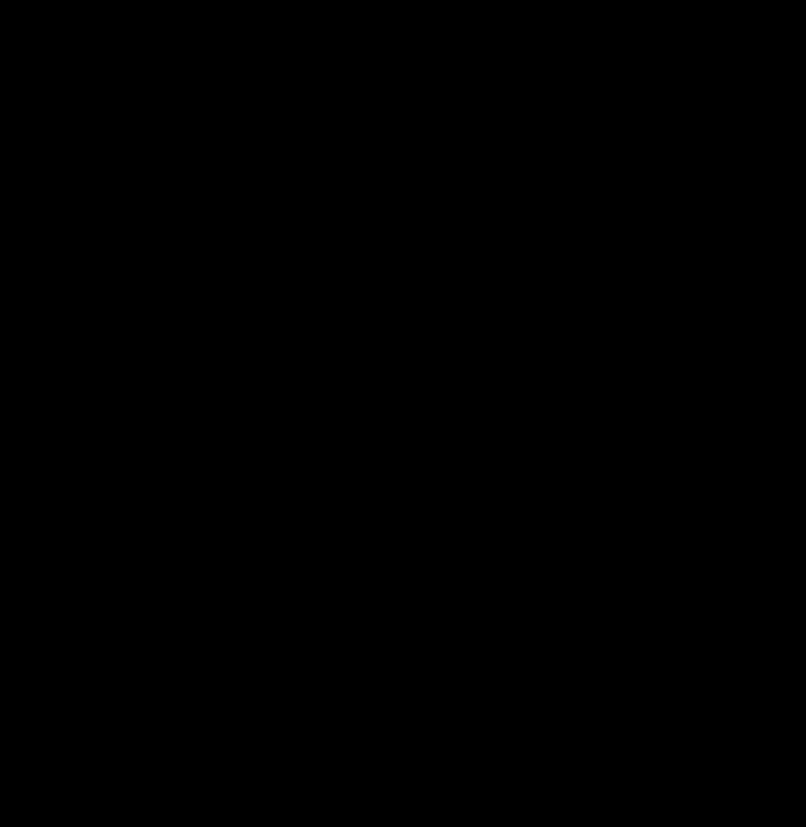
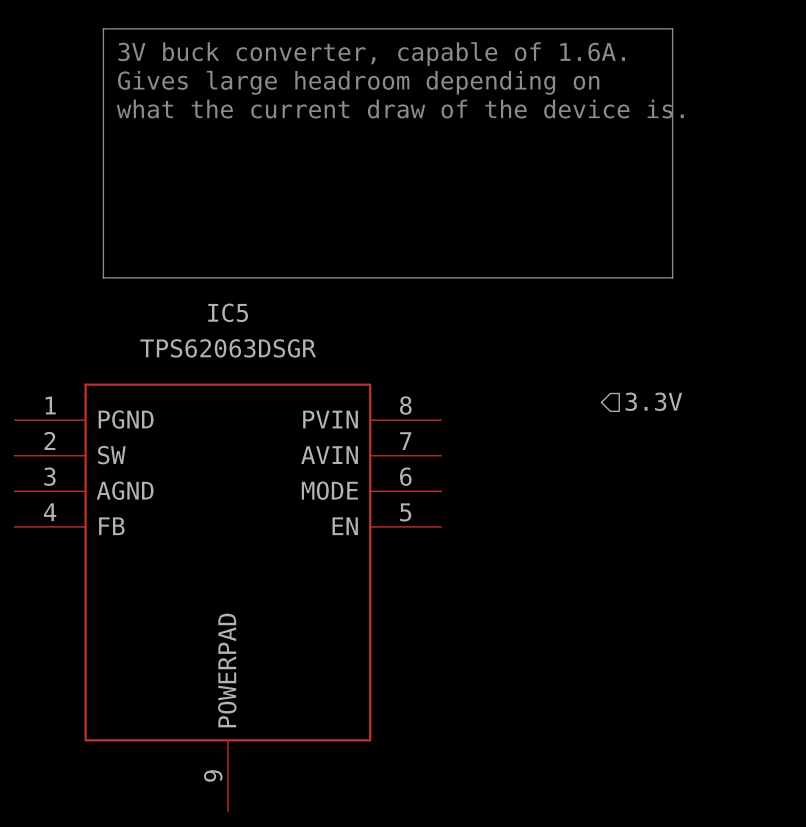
line: none -> (103, 28) (672, 28) (672, 277) (103, 277) (103, 28)
text: none -> 3V buck converter, capable of 1.6A. (371, 54)
text: none -> Gives large headroom depending on (358, 82)
text: none -> what the current draw of the device is. (400, 109)
hierarchical label: none -> 3.3V (653, 401)
IC5: none -> TPS62063DSGR (227, 597)

